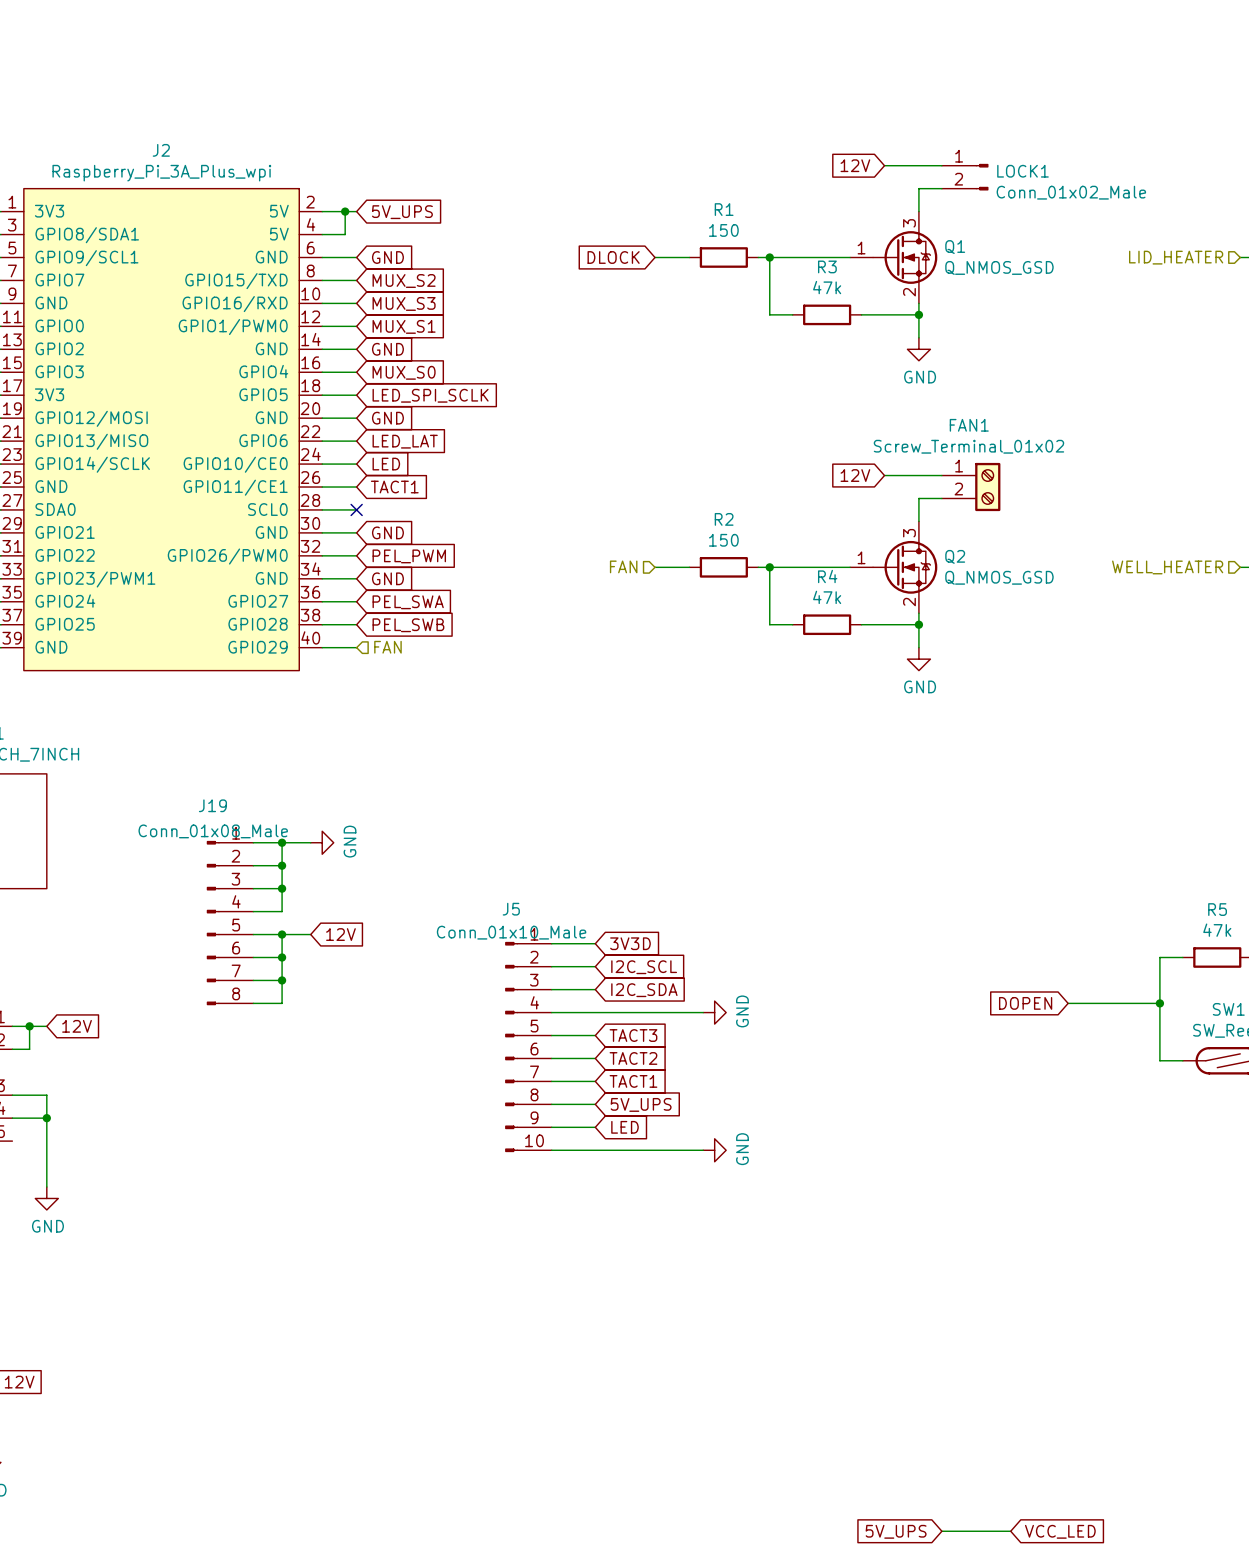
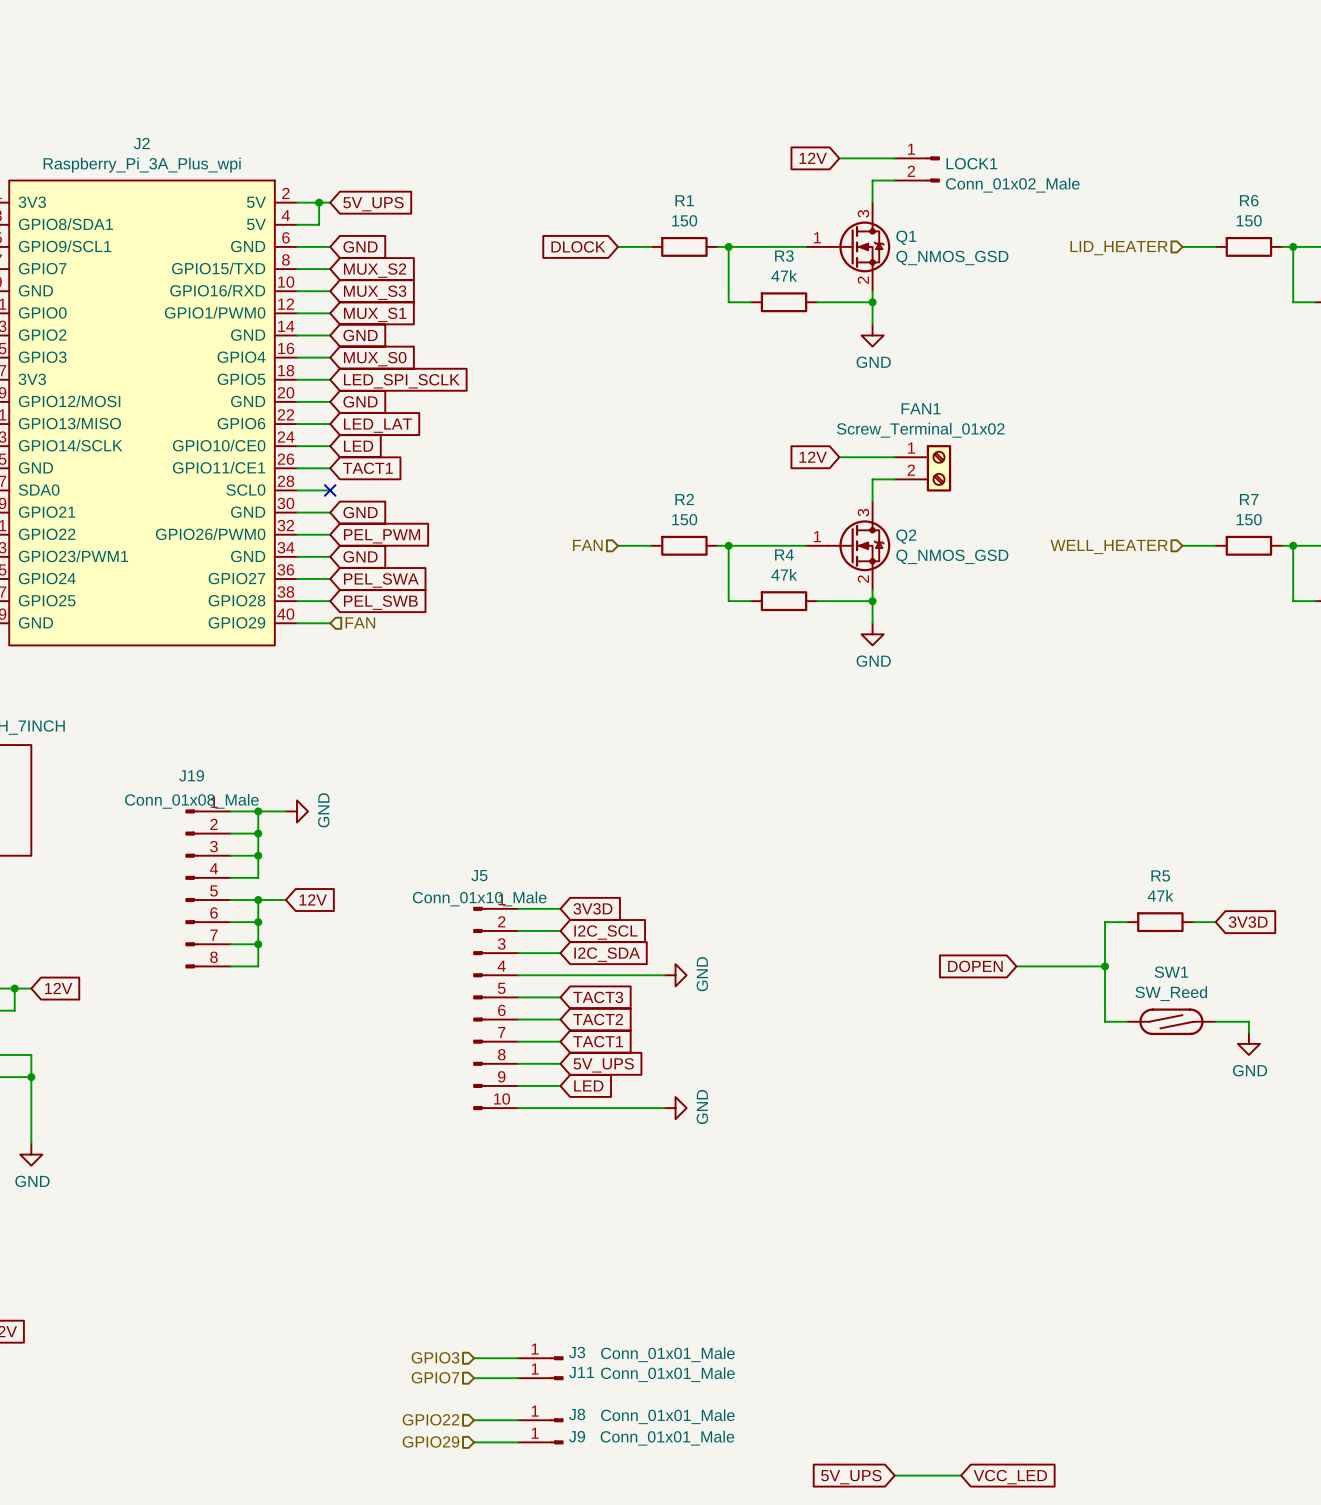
hierarchical label: none -> GPIO3 (435, 1357)
wire: none -> (474, 1358) (518, 1358)
J3: none -> Conn_01x01_Male (540, 1358)
hierarchical label: none -> GPIO7 (435, 1377)
wire: none -> (474, 1378) (518, 1378)
J11: none -> Conn_01x01_Male (540, 1378)
hierarchical label: none -> GPIO22 (430, 1419)
wire: none -> (474, 1420) (518, 1420)
J8: none -> Conn_01x01_Male (540, 1420)
hierarchical label: none -> GPIO29 (430, 1441)
wire: none -> (474, 1442) (518, 1442)
J9: none -> Conn_01x01_Male (540, 1442)

